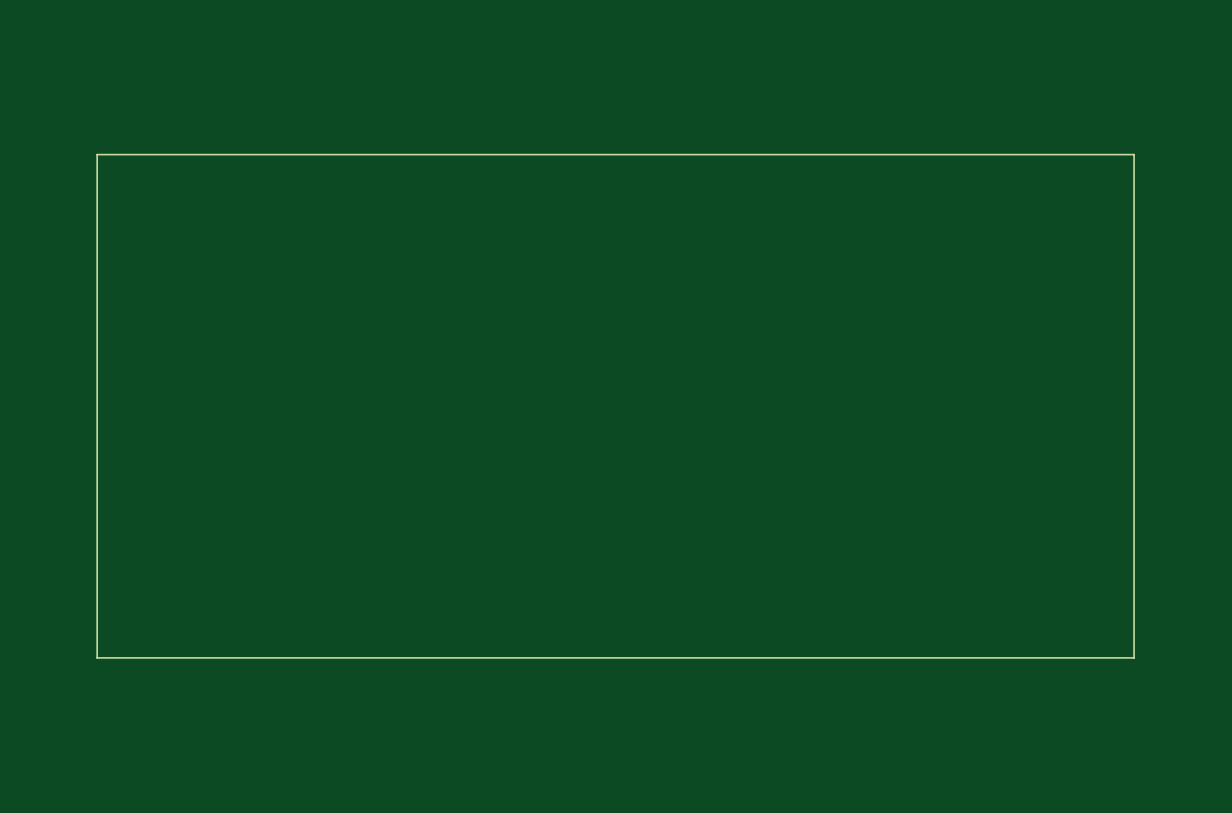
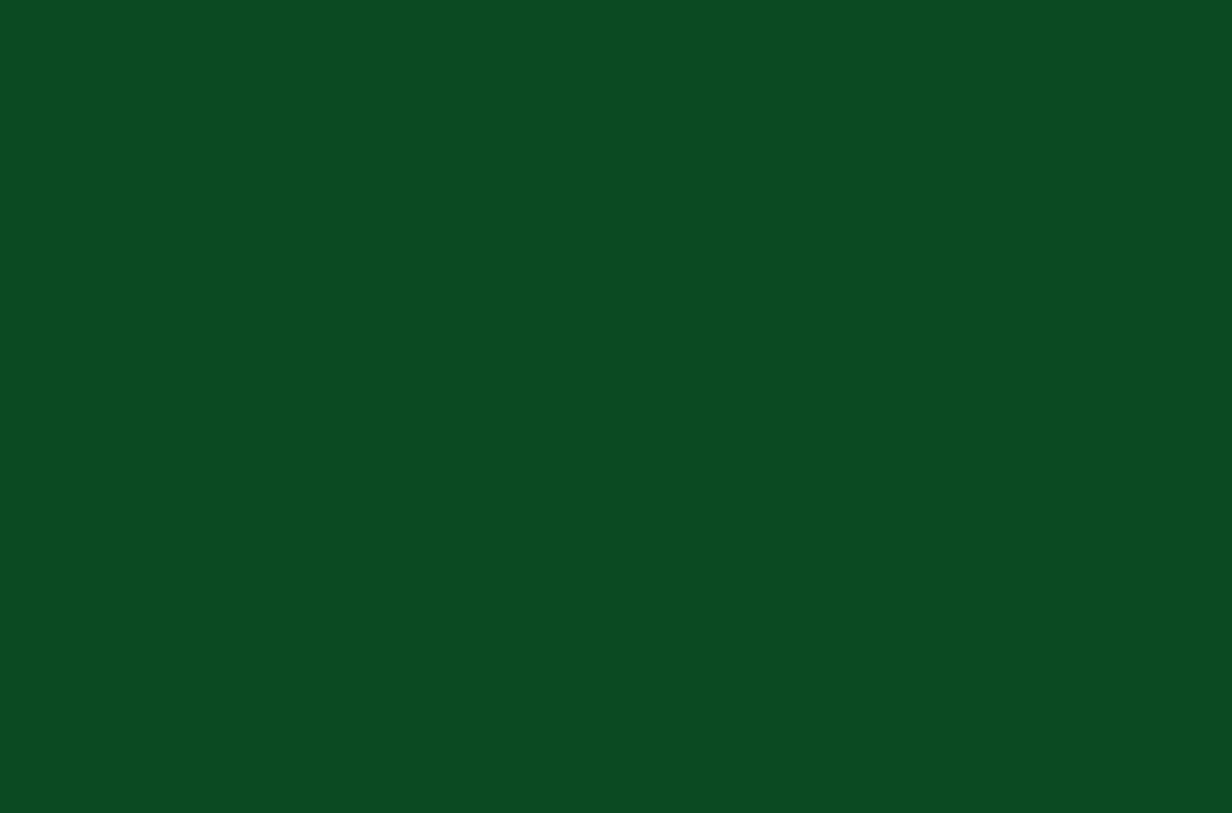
board edge: (1134, 154) (97, 154) (97, 657) (1134, 657) (1134, 154) -> none

